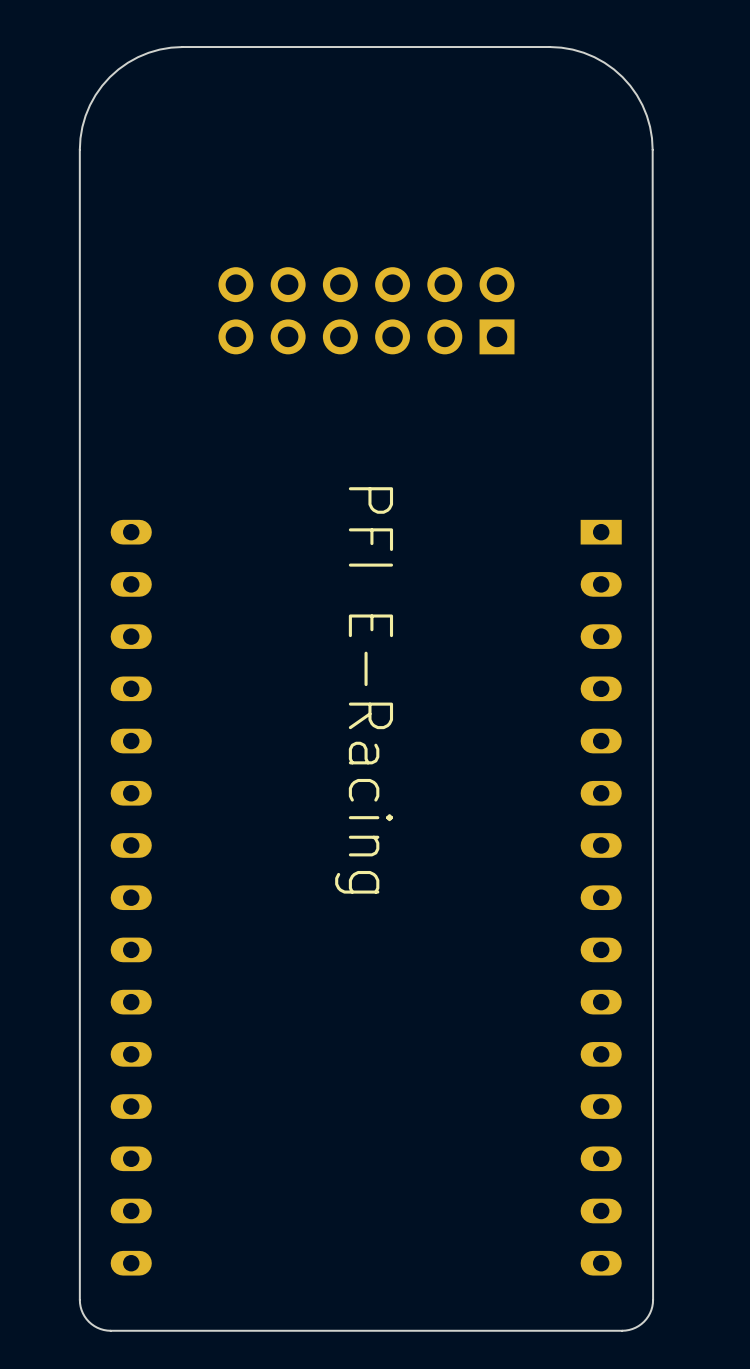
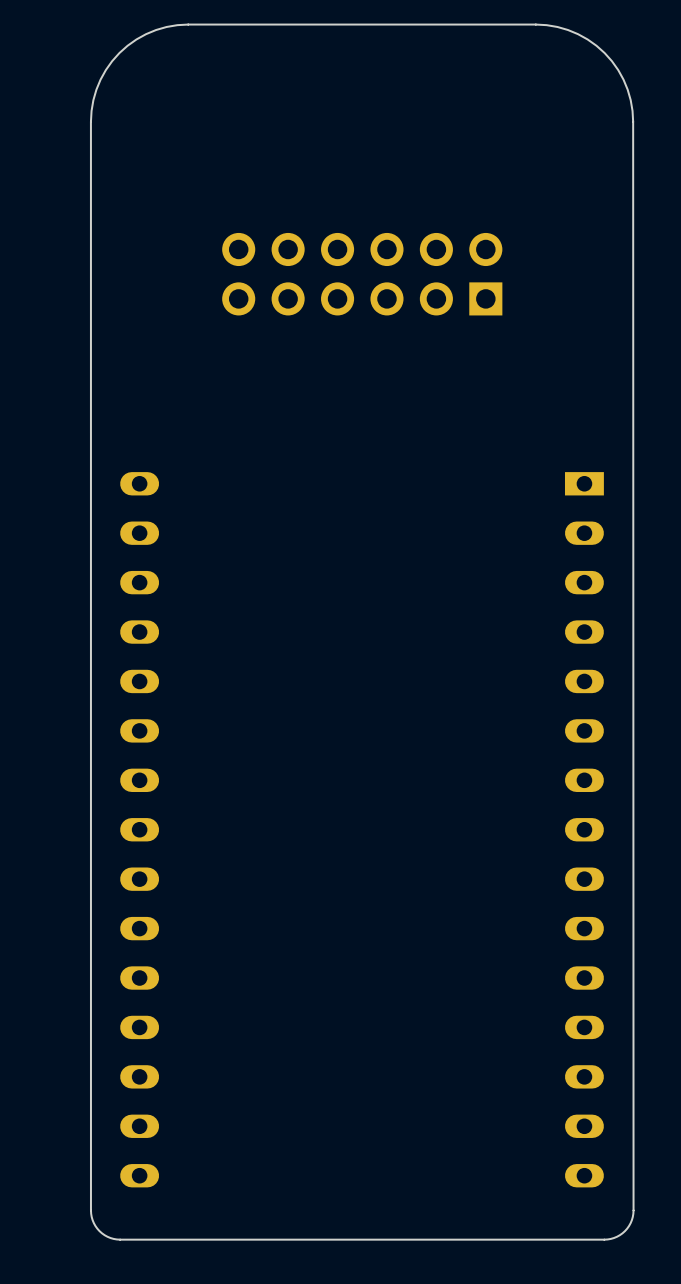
text: PFI E-Racing (364, 690) -> none

